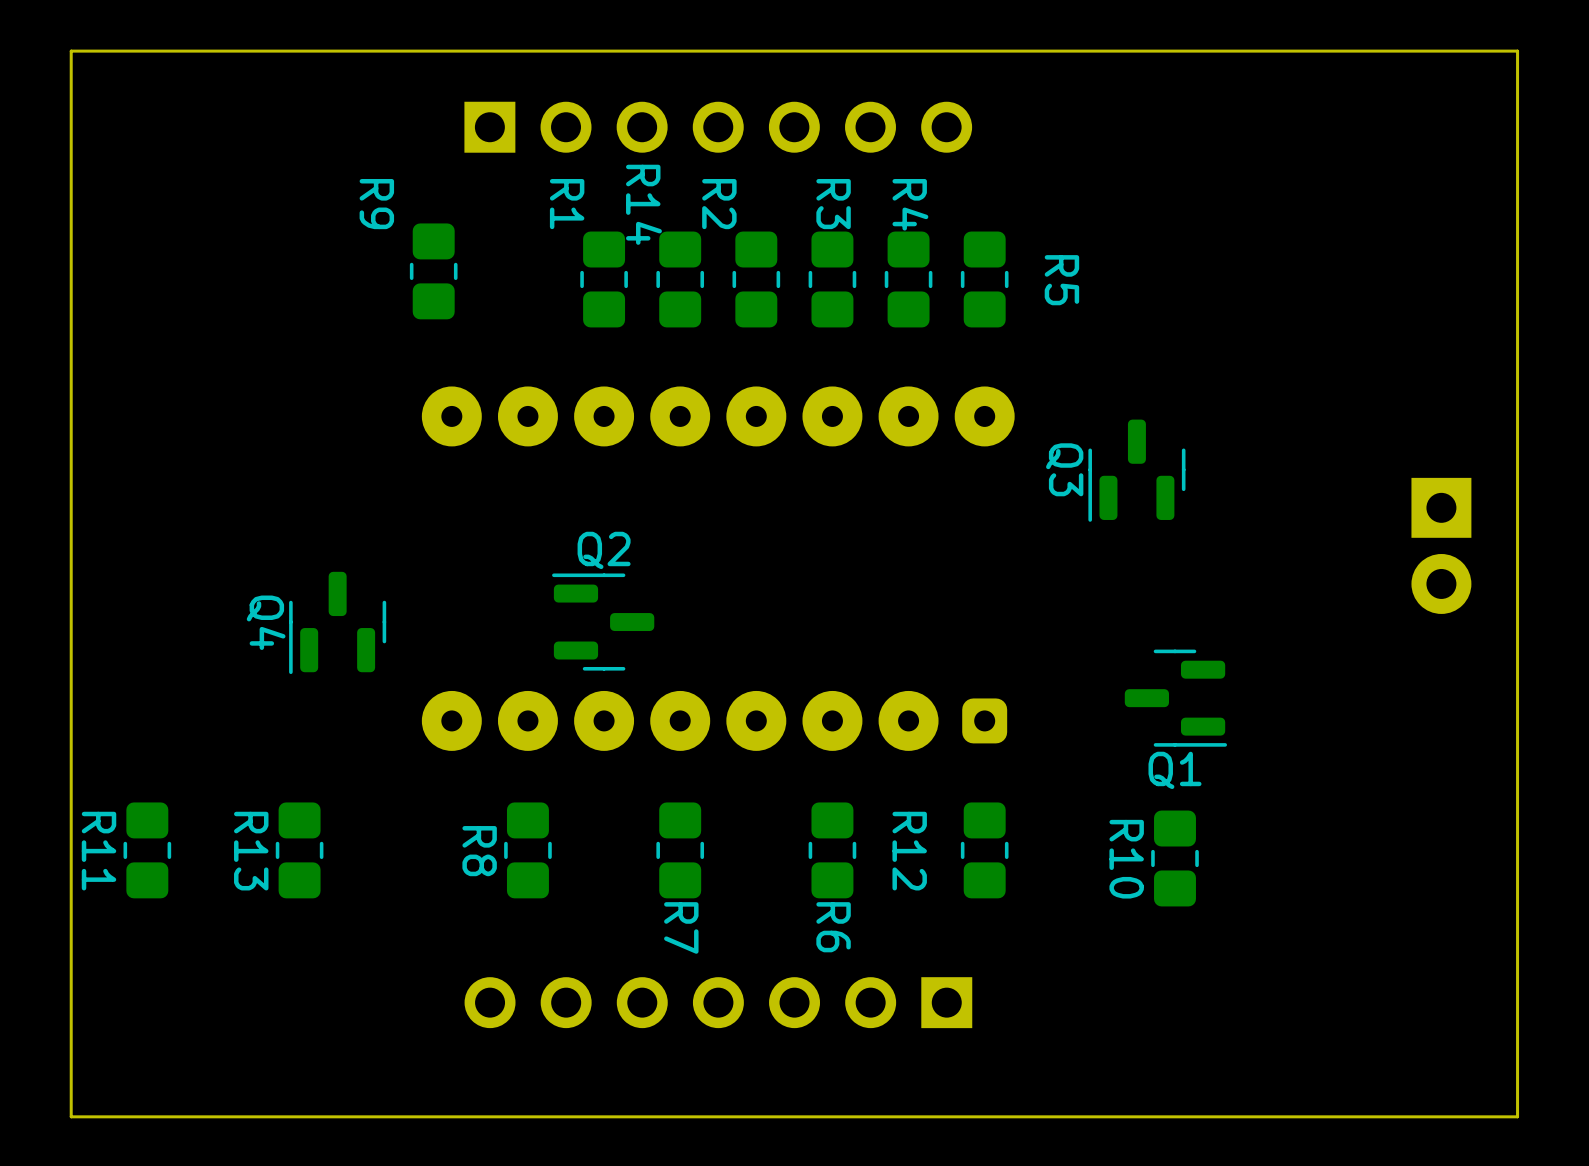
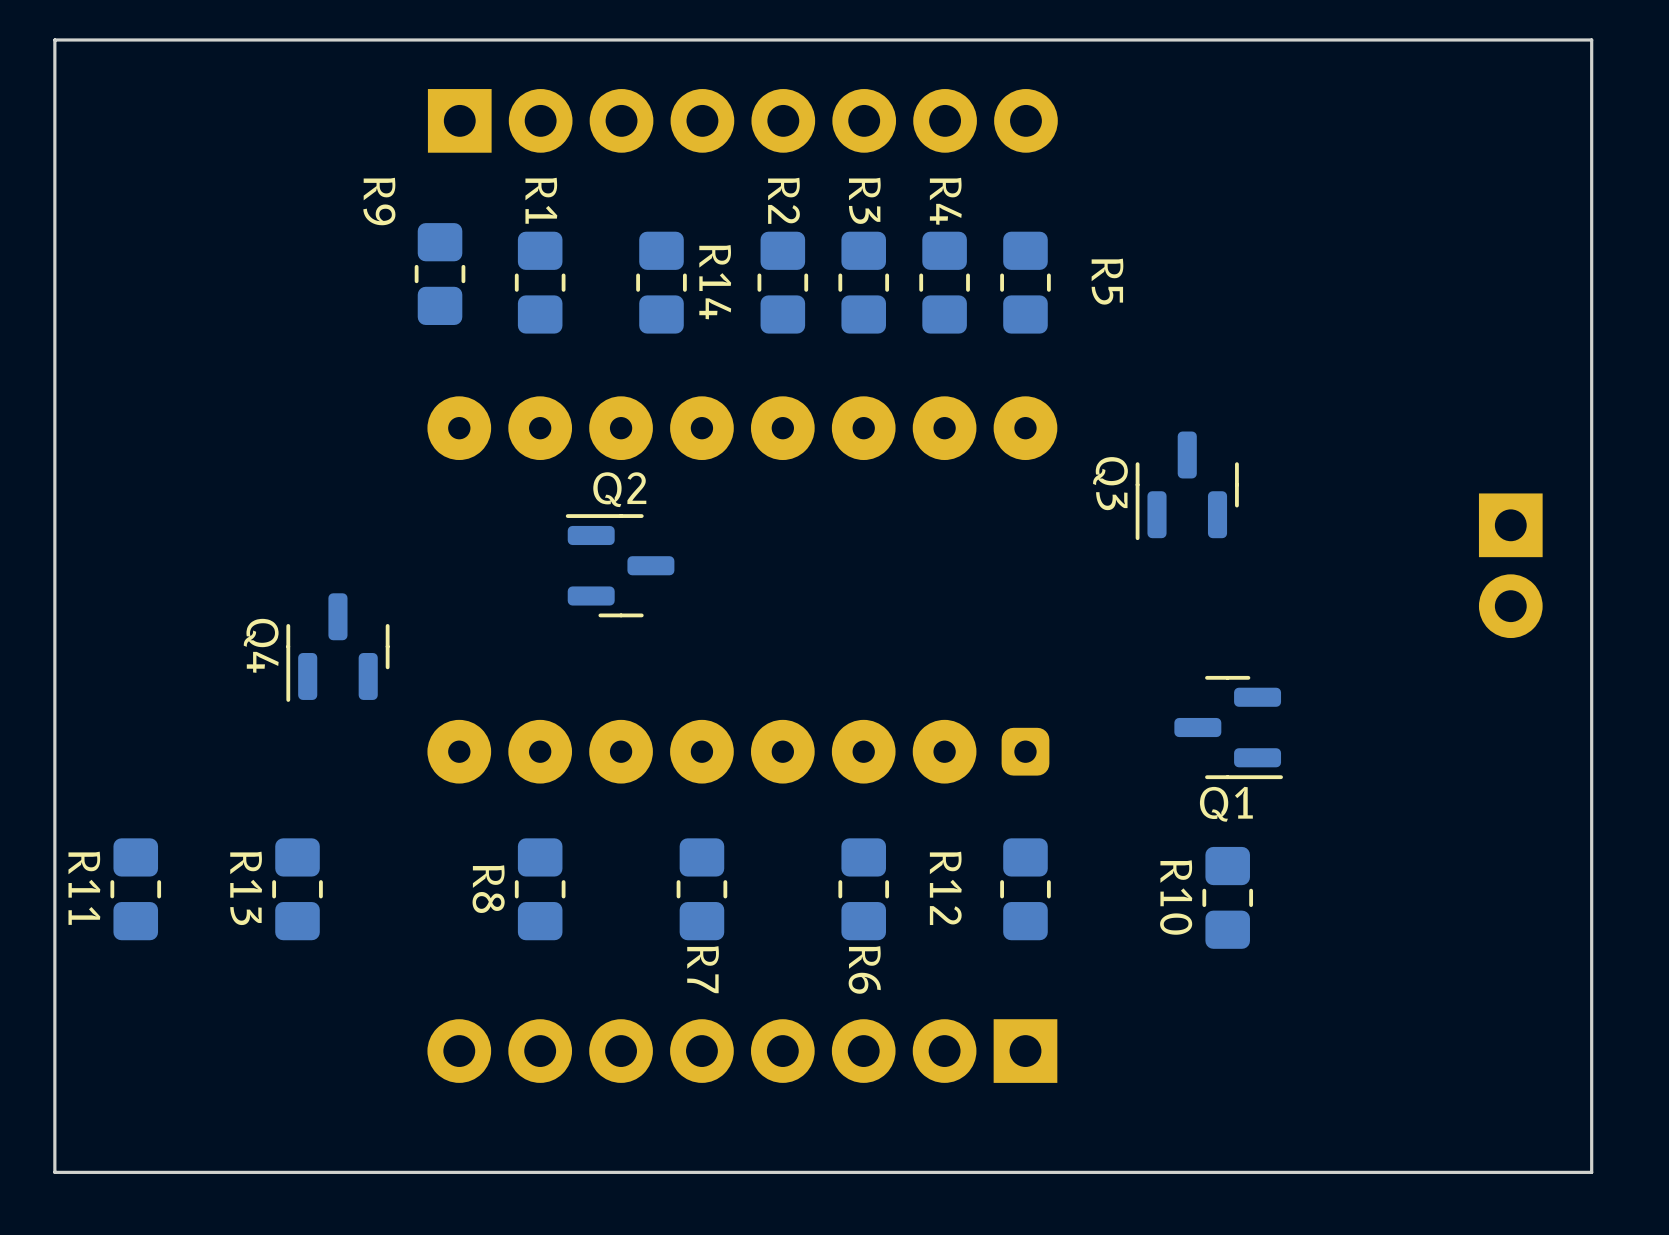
part footprint: [464, 101, 973, 153] -> [427, 89, 1058, 153]
R1 name position: R1 (567, 204) -> R1 (541, 200)
R14 name position: R14 (643, 204) -> R14 (715, 282)
R2 name position: R2 (719, 204) -> R2 (783, 200)
R1 position: (604, 279) -> (540, 282)
R14 position: (680, 279) -> (661, 282)
Q2 position: (603, 622) -> (620, 565)
part footprint: [464, 977, 973, 1029] -> [427, 1019, 1058, 1083]

